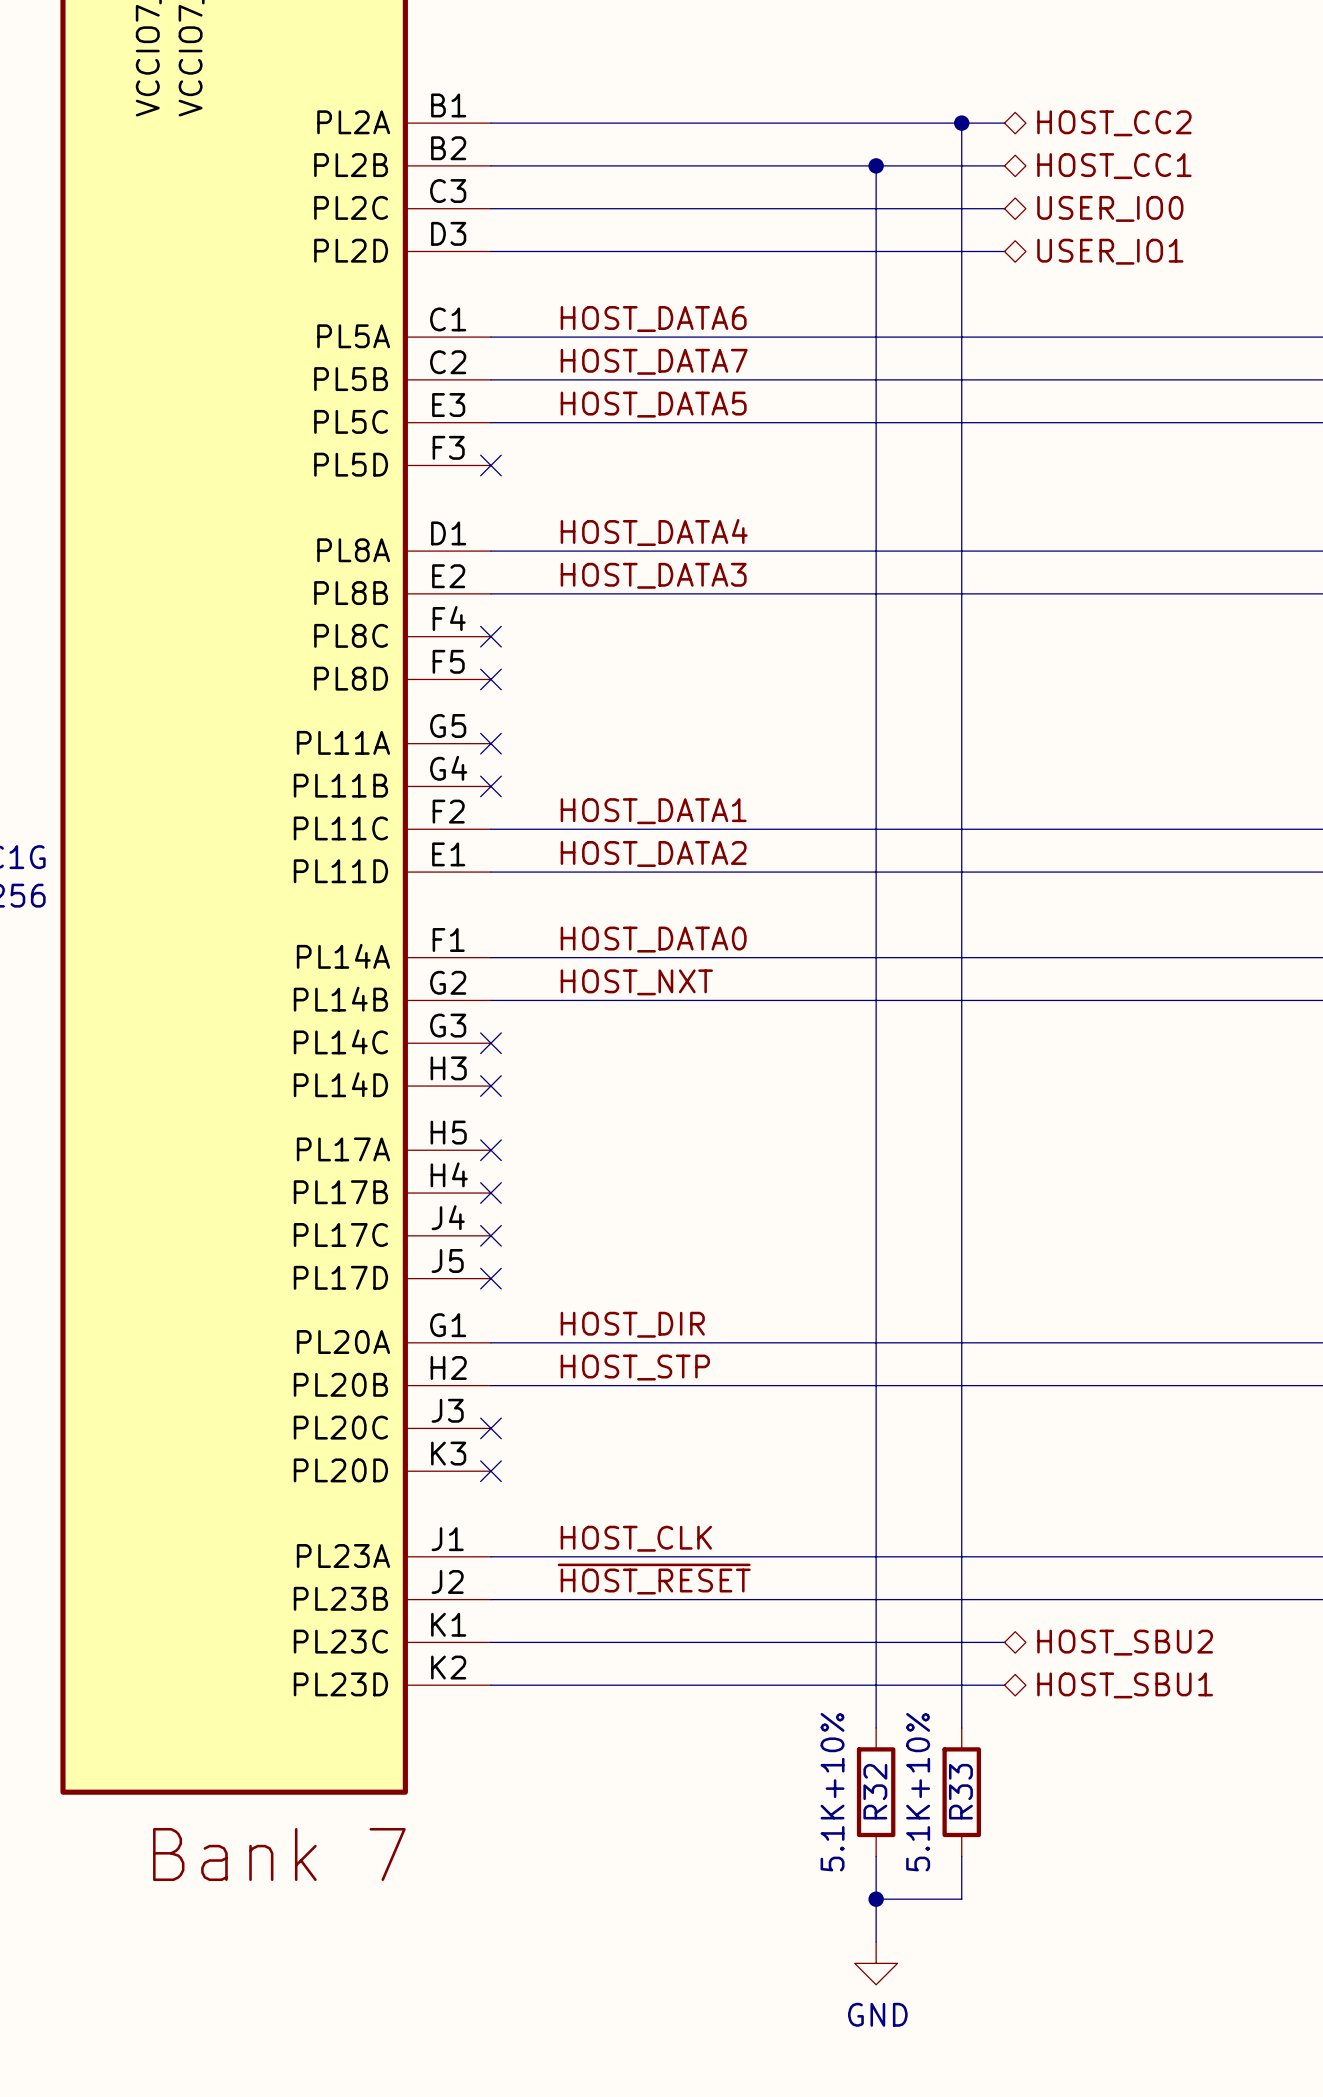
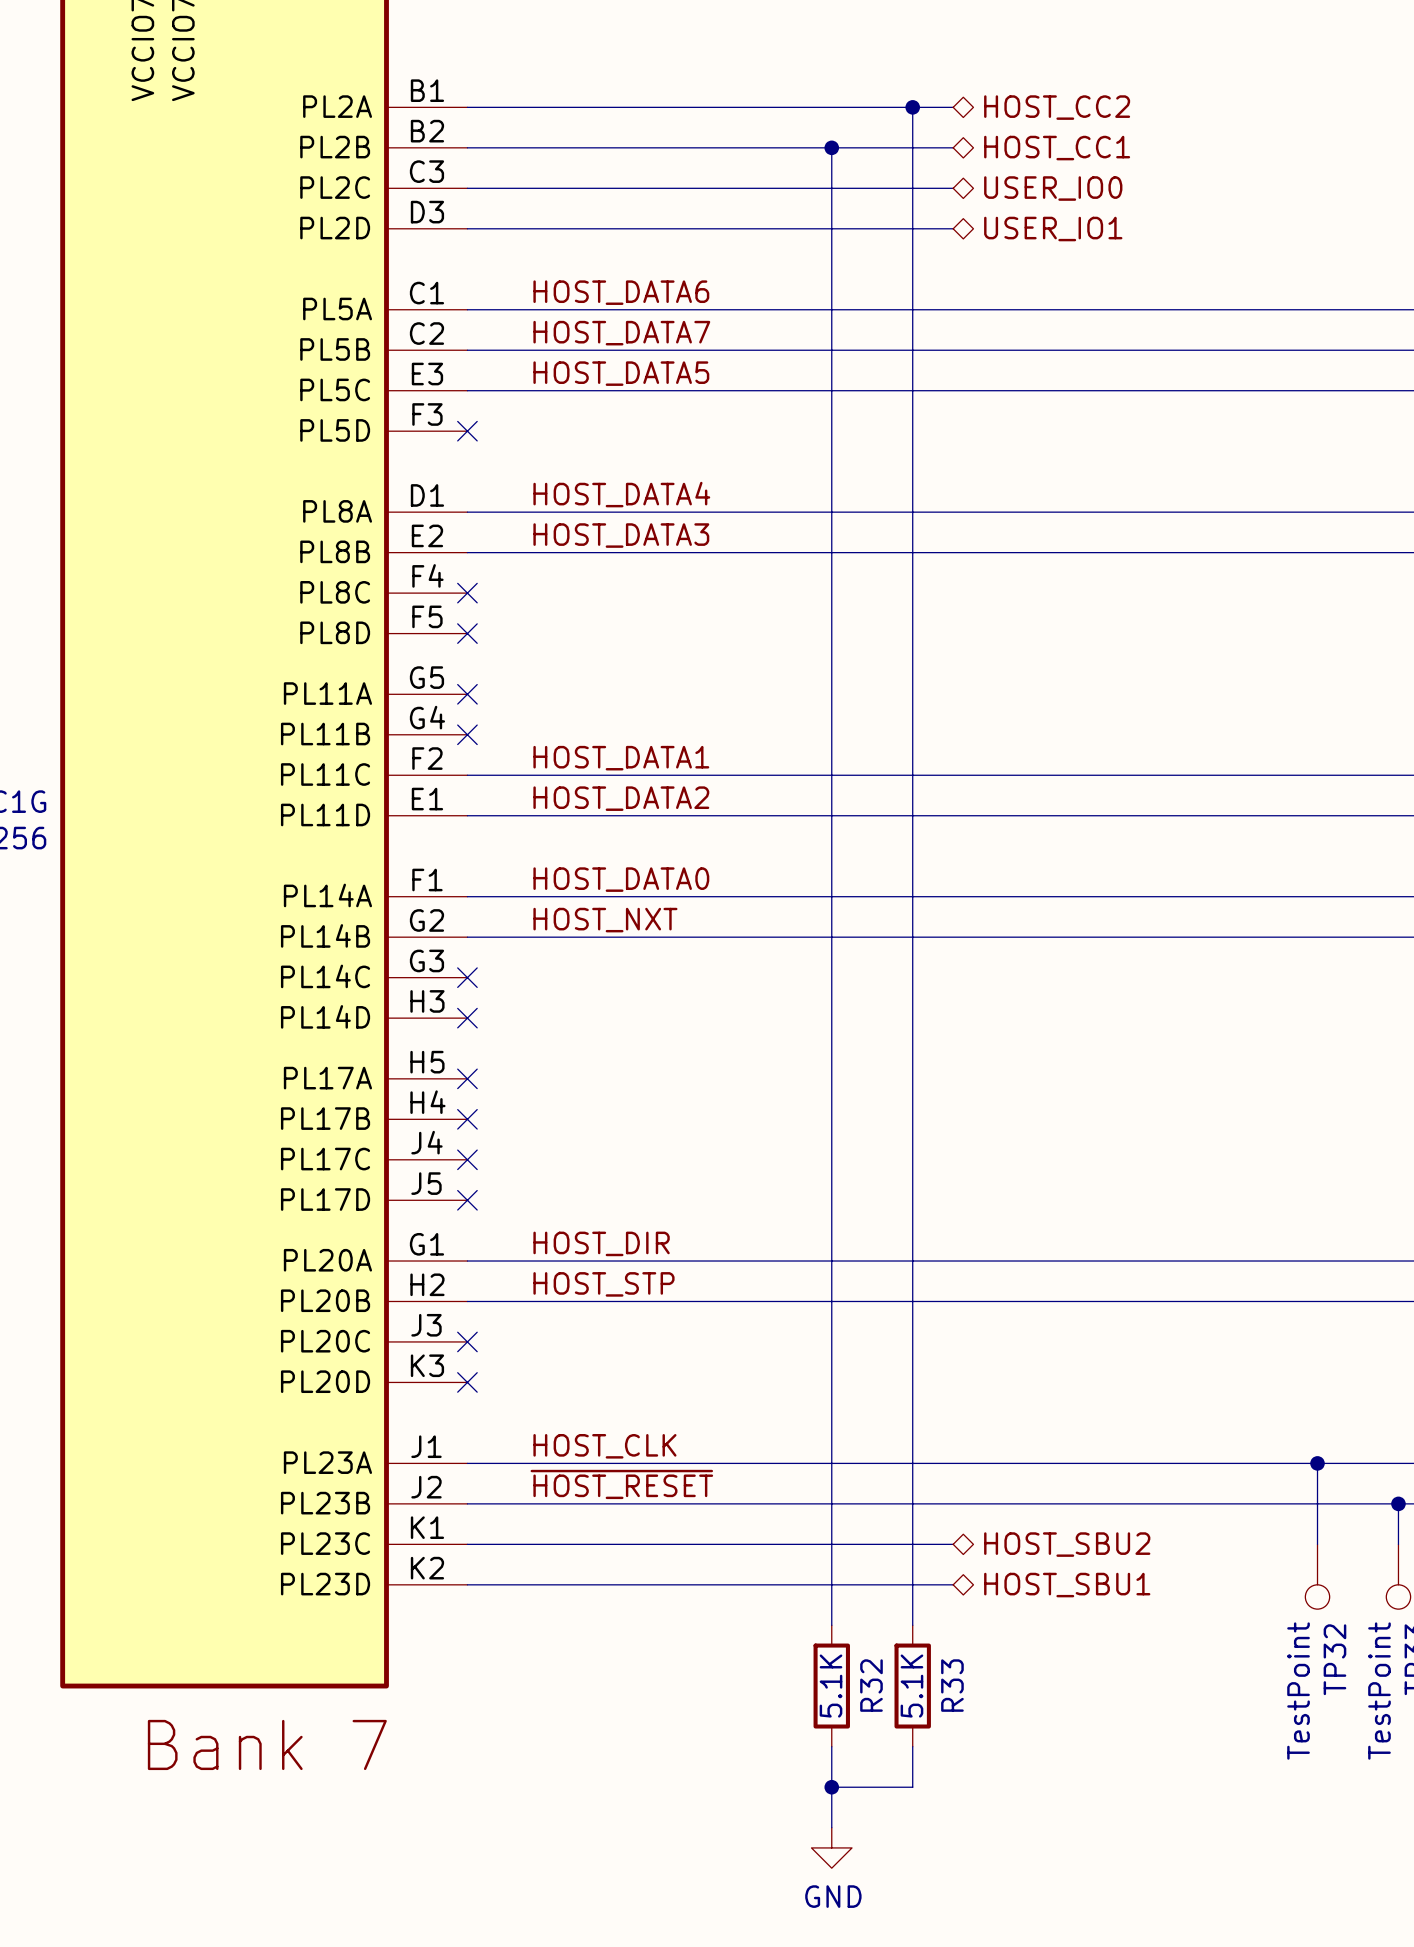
R32 name position: R32 (875, 1791) -> R32 (871, 1685)
R33 name position: R33 (960, 1791) -> R33 (952, 1685)
R32 value: 5.1K+10% (832, 1792) -> 5.1K (831, 1686)
R33 value: 5.1K+10% (918, 1792) -> 5.1K (911, 1686)

